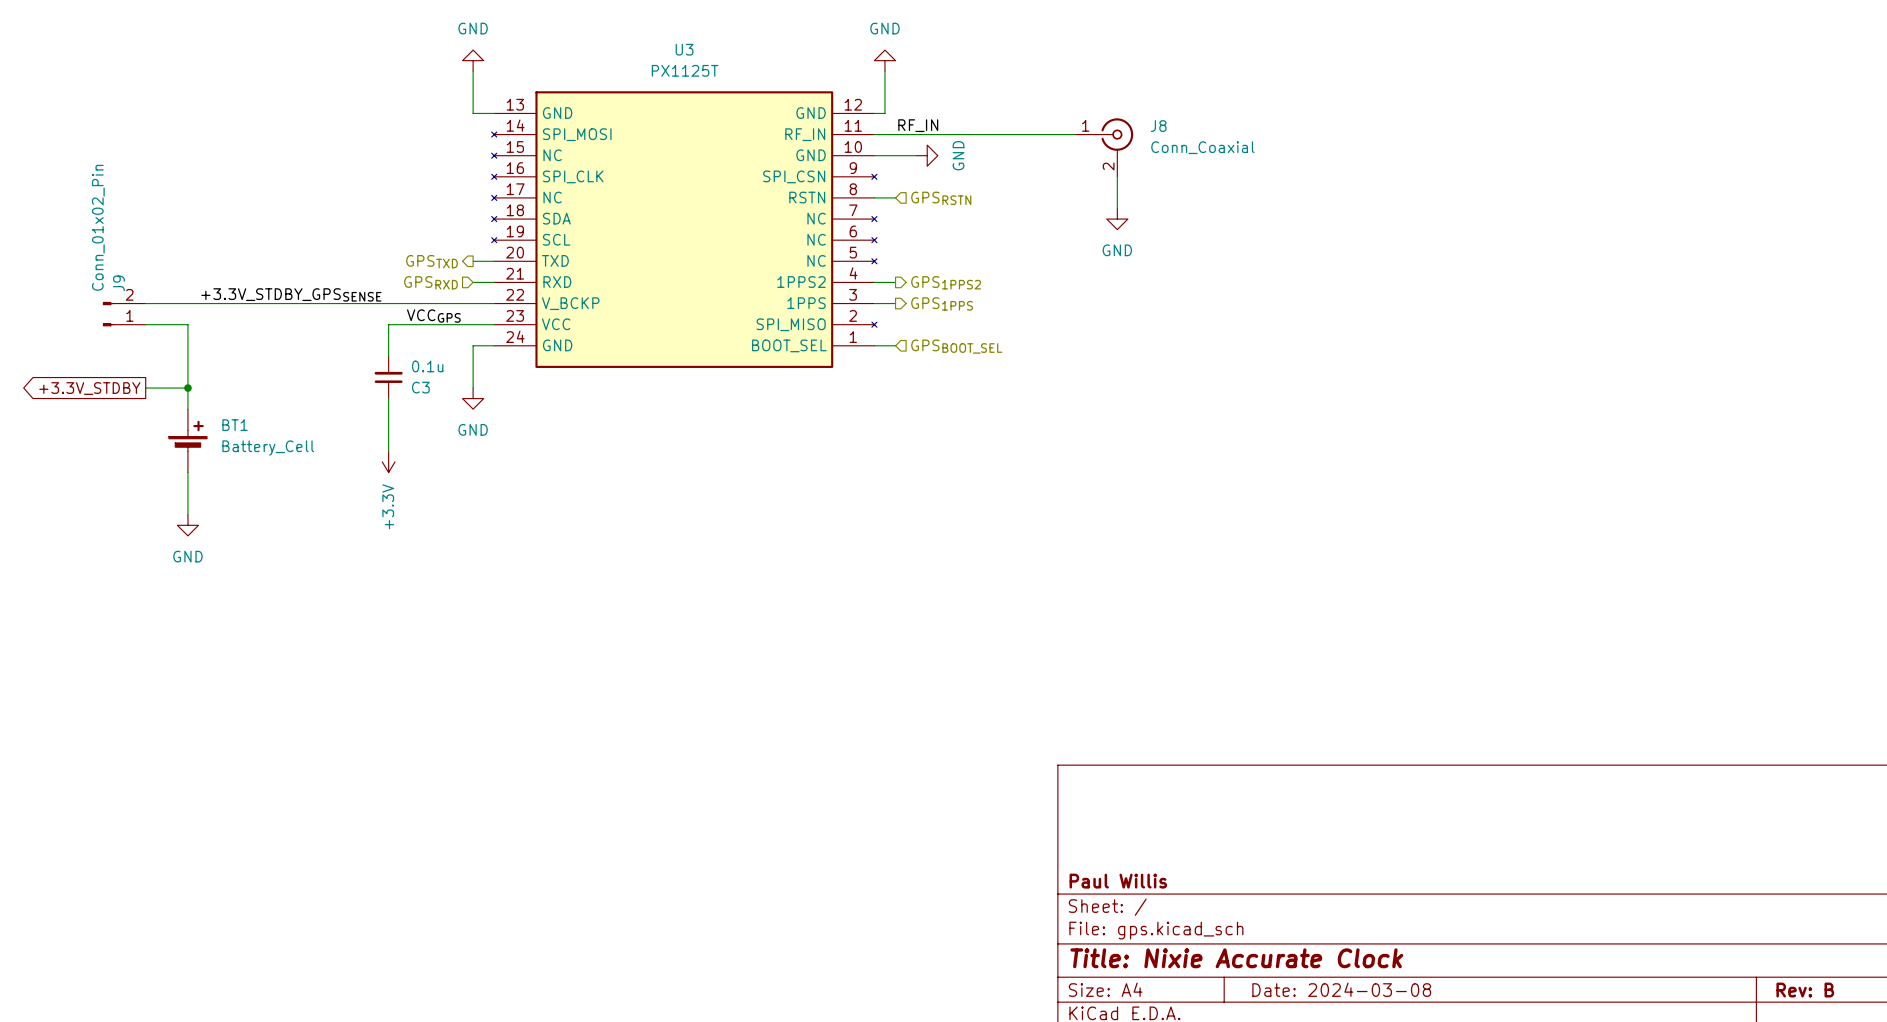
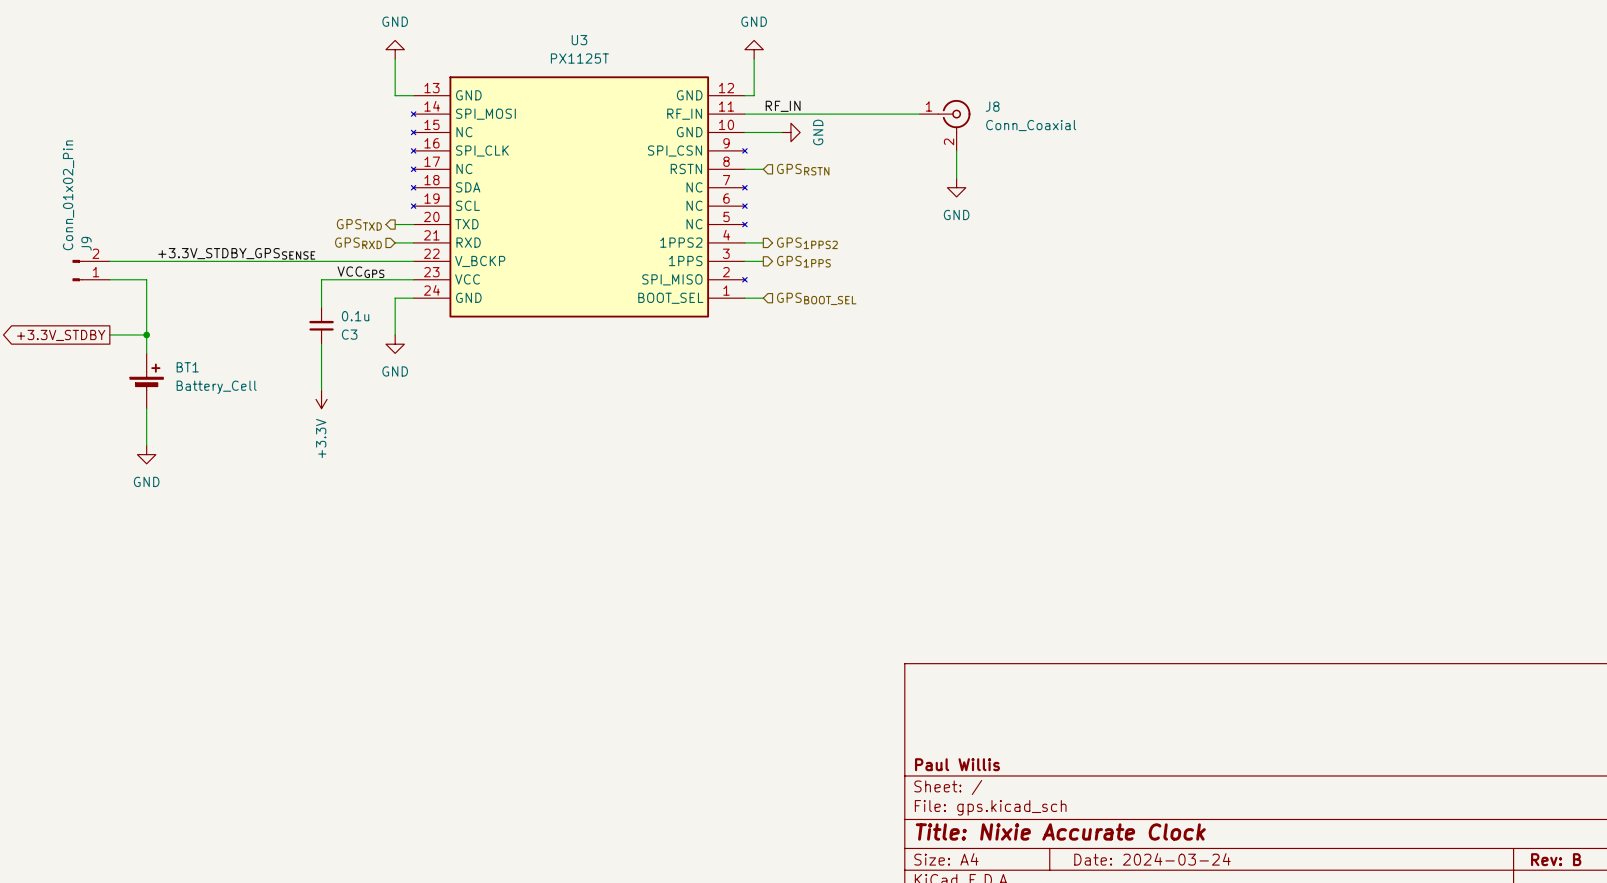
title block: Date: 2024-03-08 (1341, 989) -> Date: 2024-03-24 (1152, 859)

